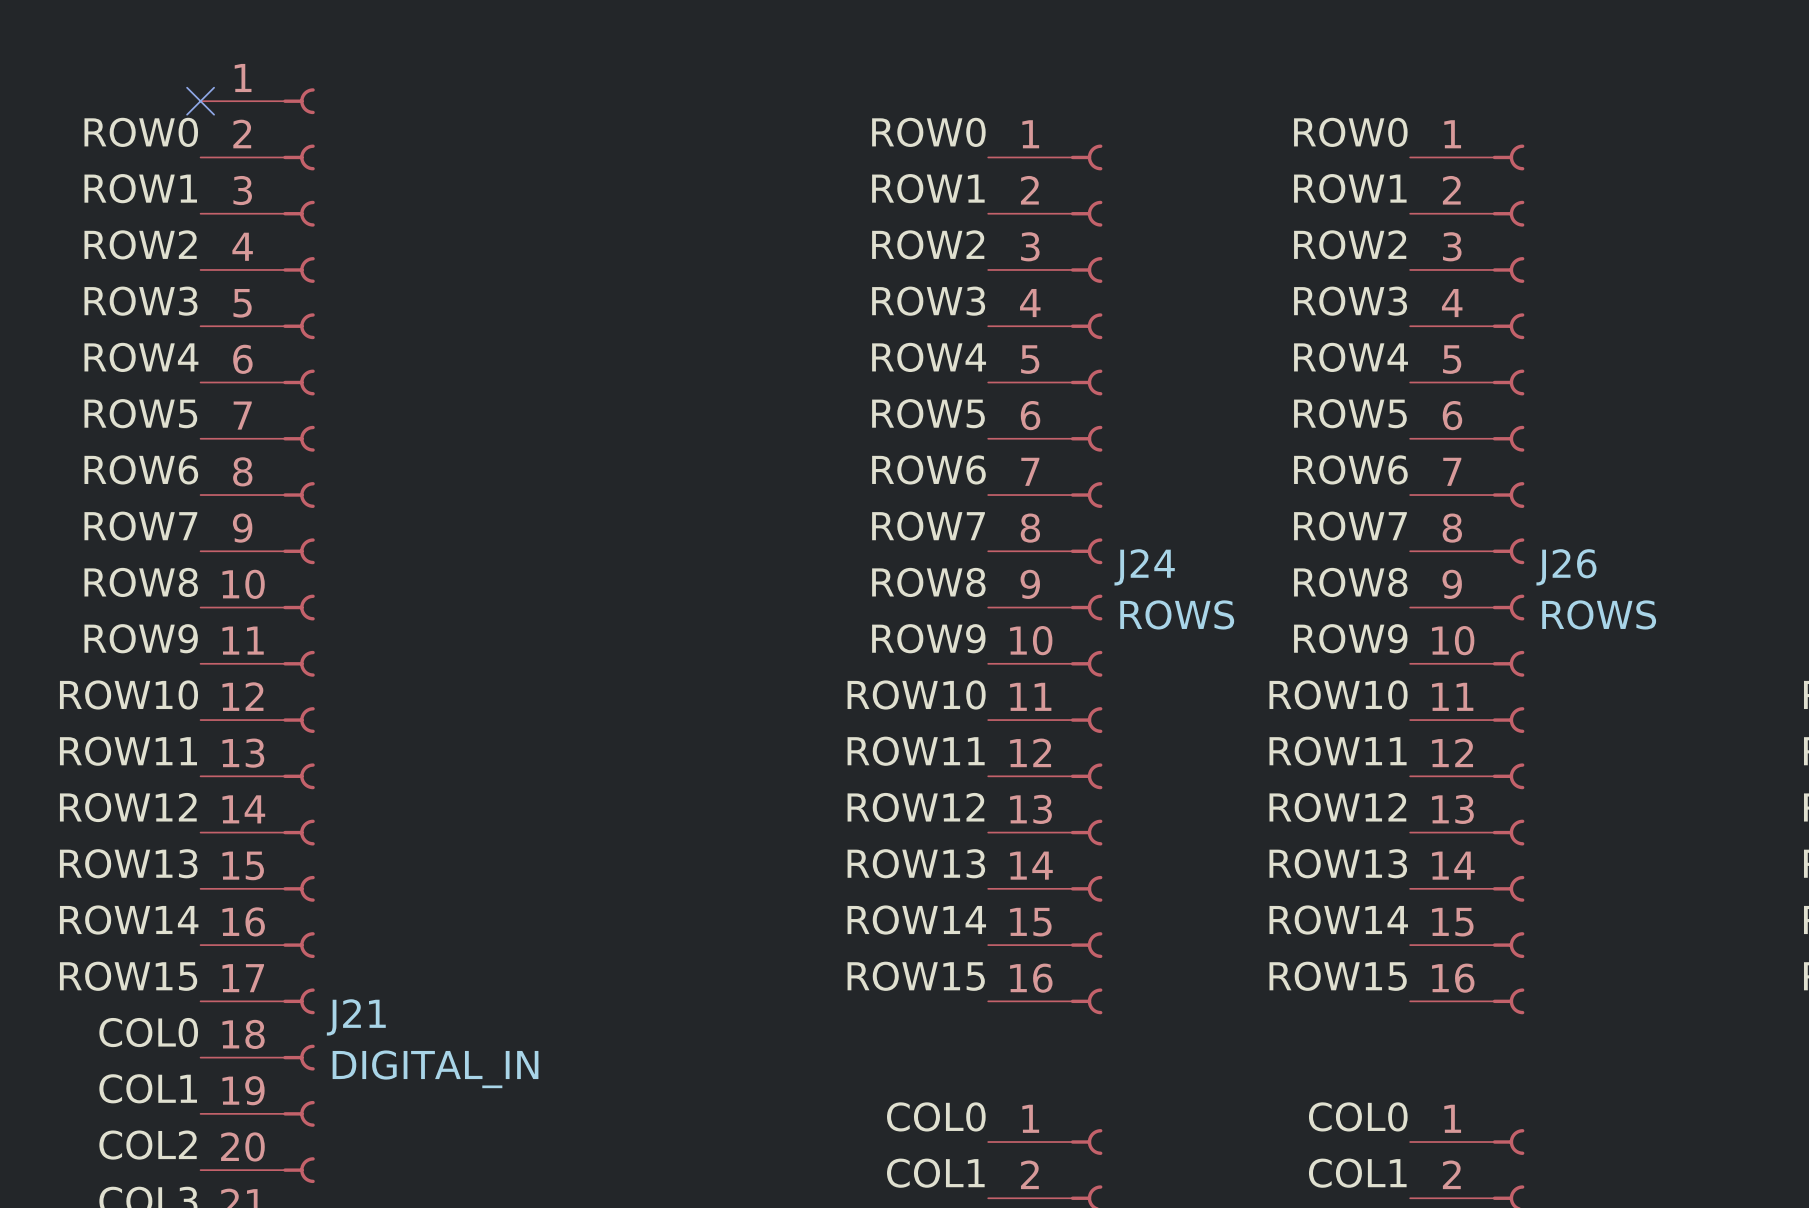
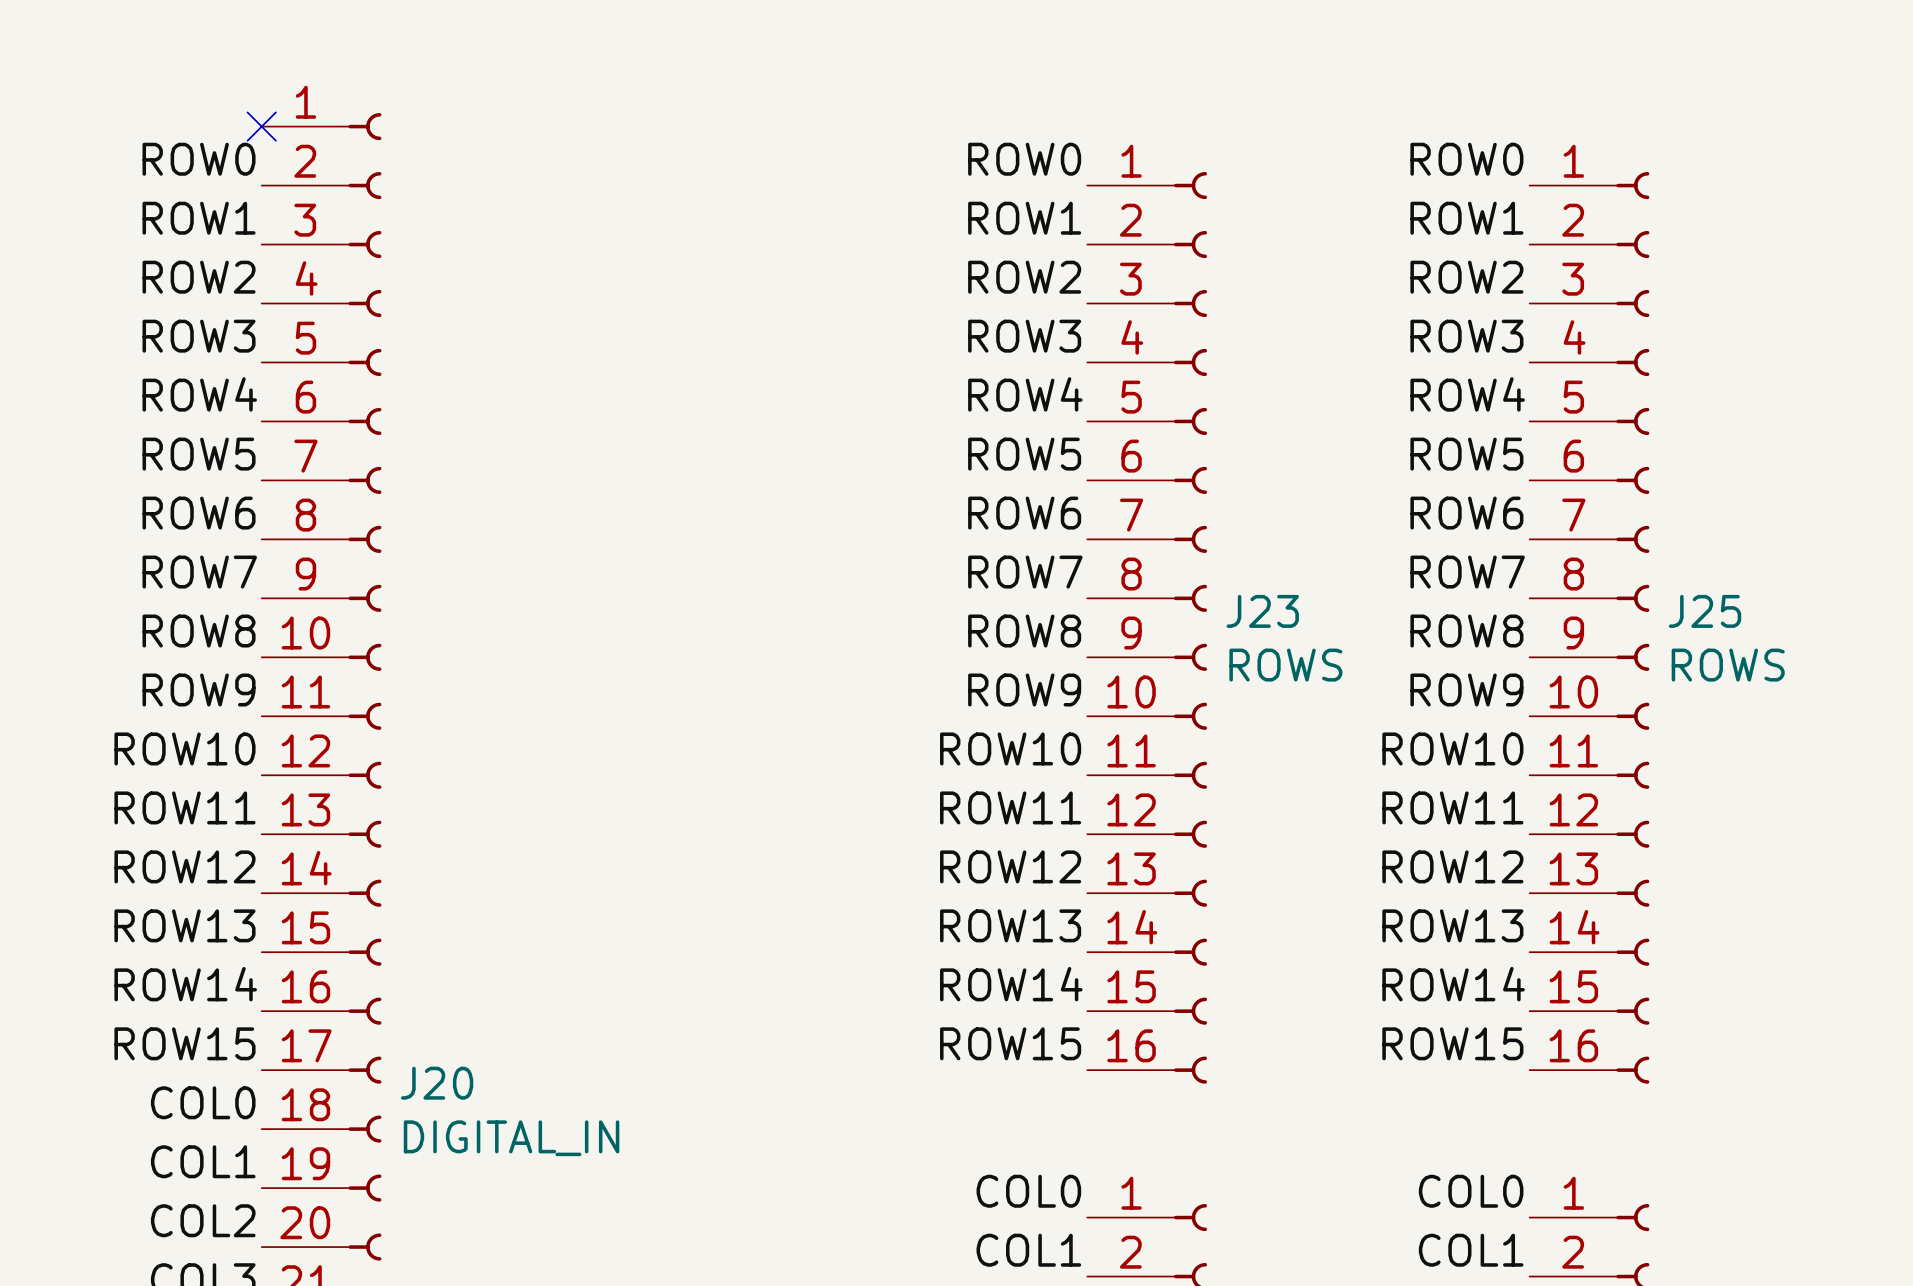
J24 name: J24 (1144, 567) -> J23 (1262, 611)
J26 name: J26 (1566, 567) -> J25 (1705, 611)
J21 name: J21 (356, 1017) -> J20 (437, 1083)

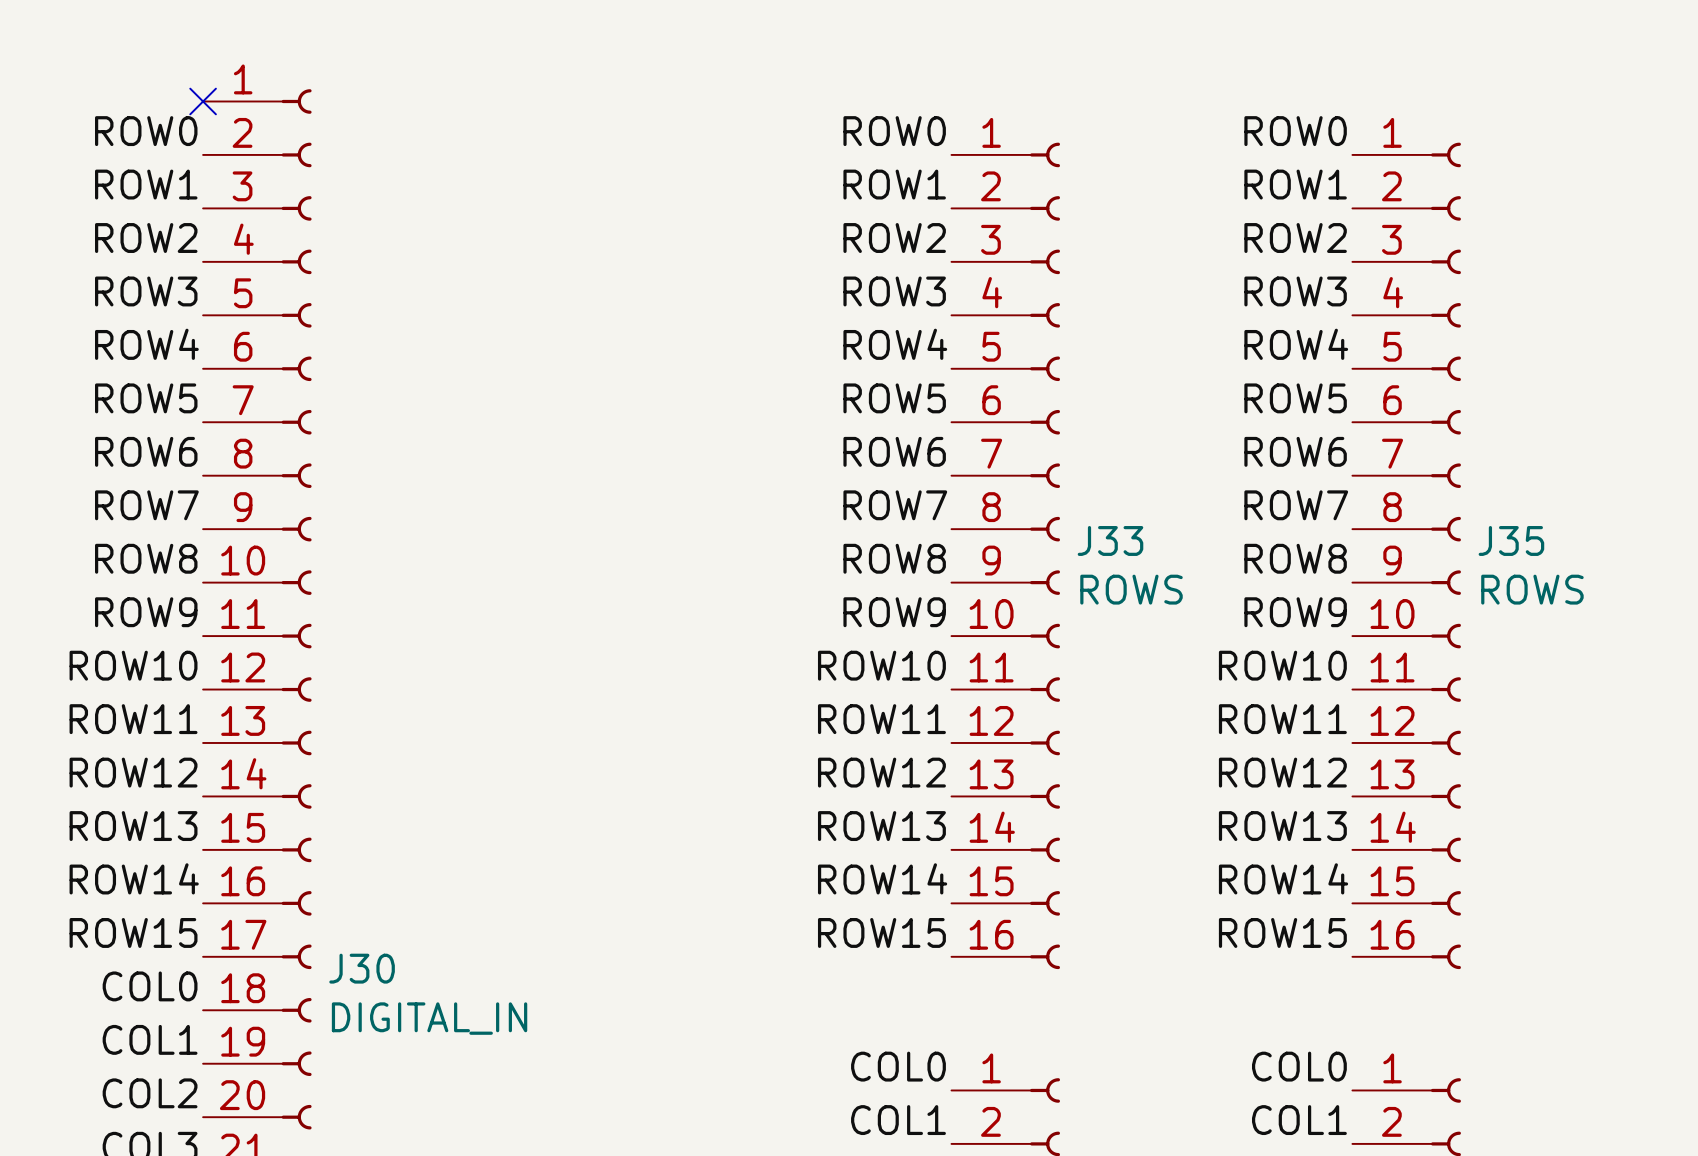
J23 name: J23 (1262, 611) -> J33 (1110, 540)
J25 name: J25 (1705, 611) -> J35 (1511, 540)
J20 name: J20 (437, 1083) -> J30 (362, 968)

